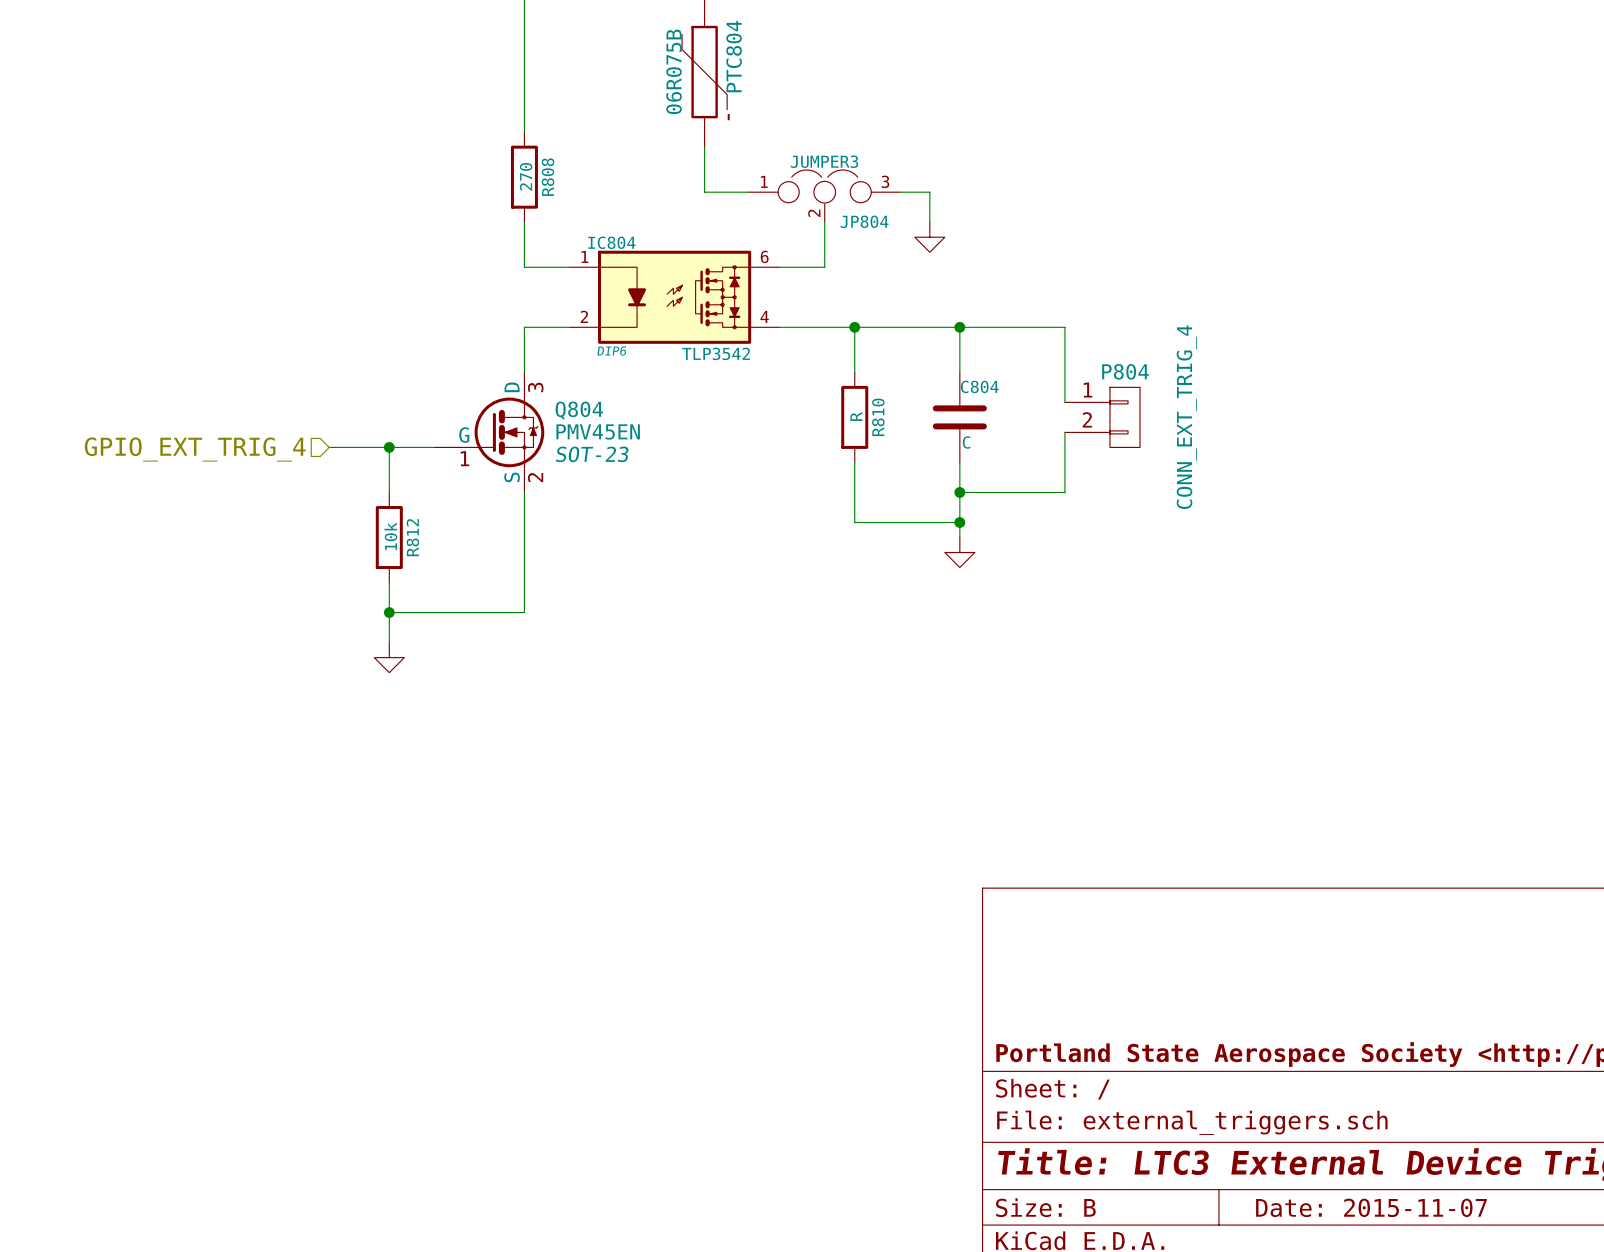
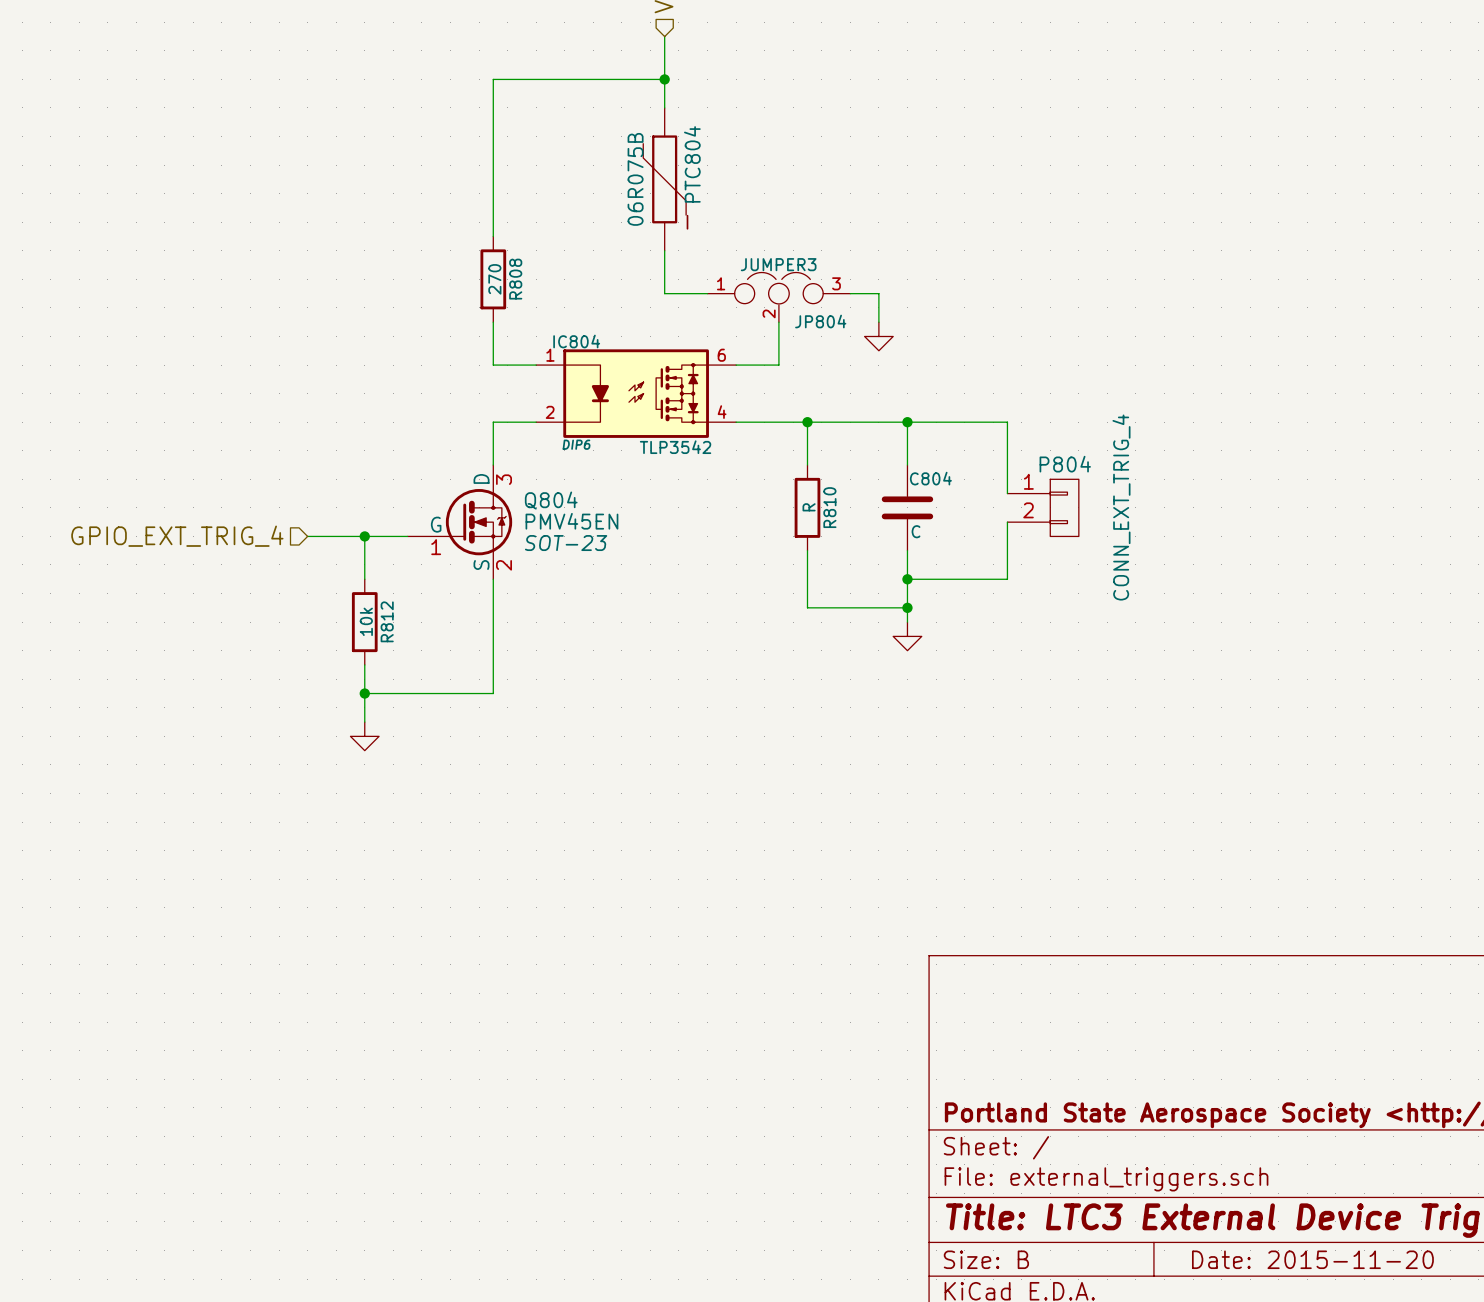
title block: Date: 2015-11-07 (1371, 1207) -> Date: 2015-11-20 (1312, 1259)

